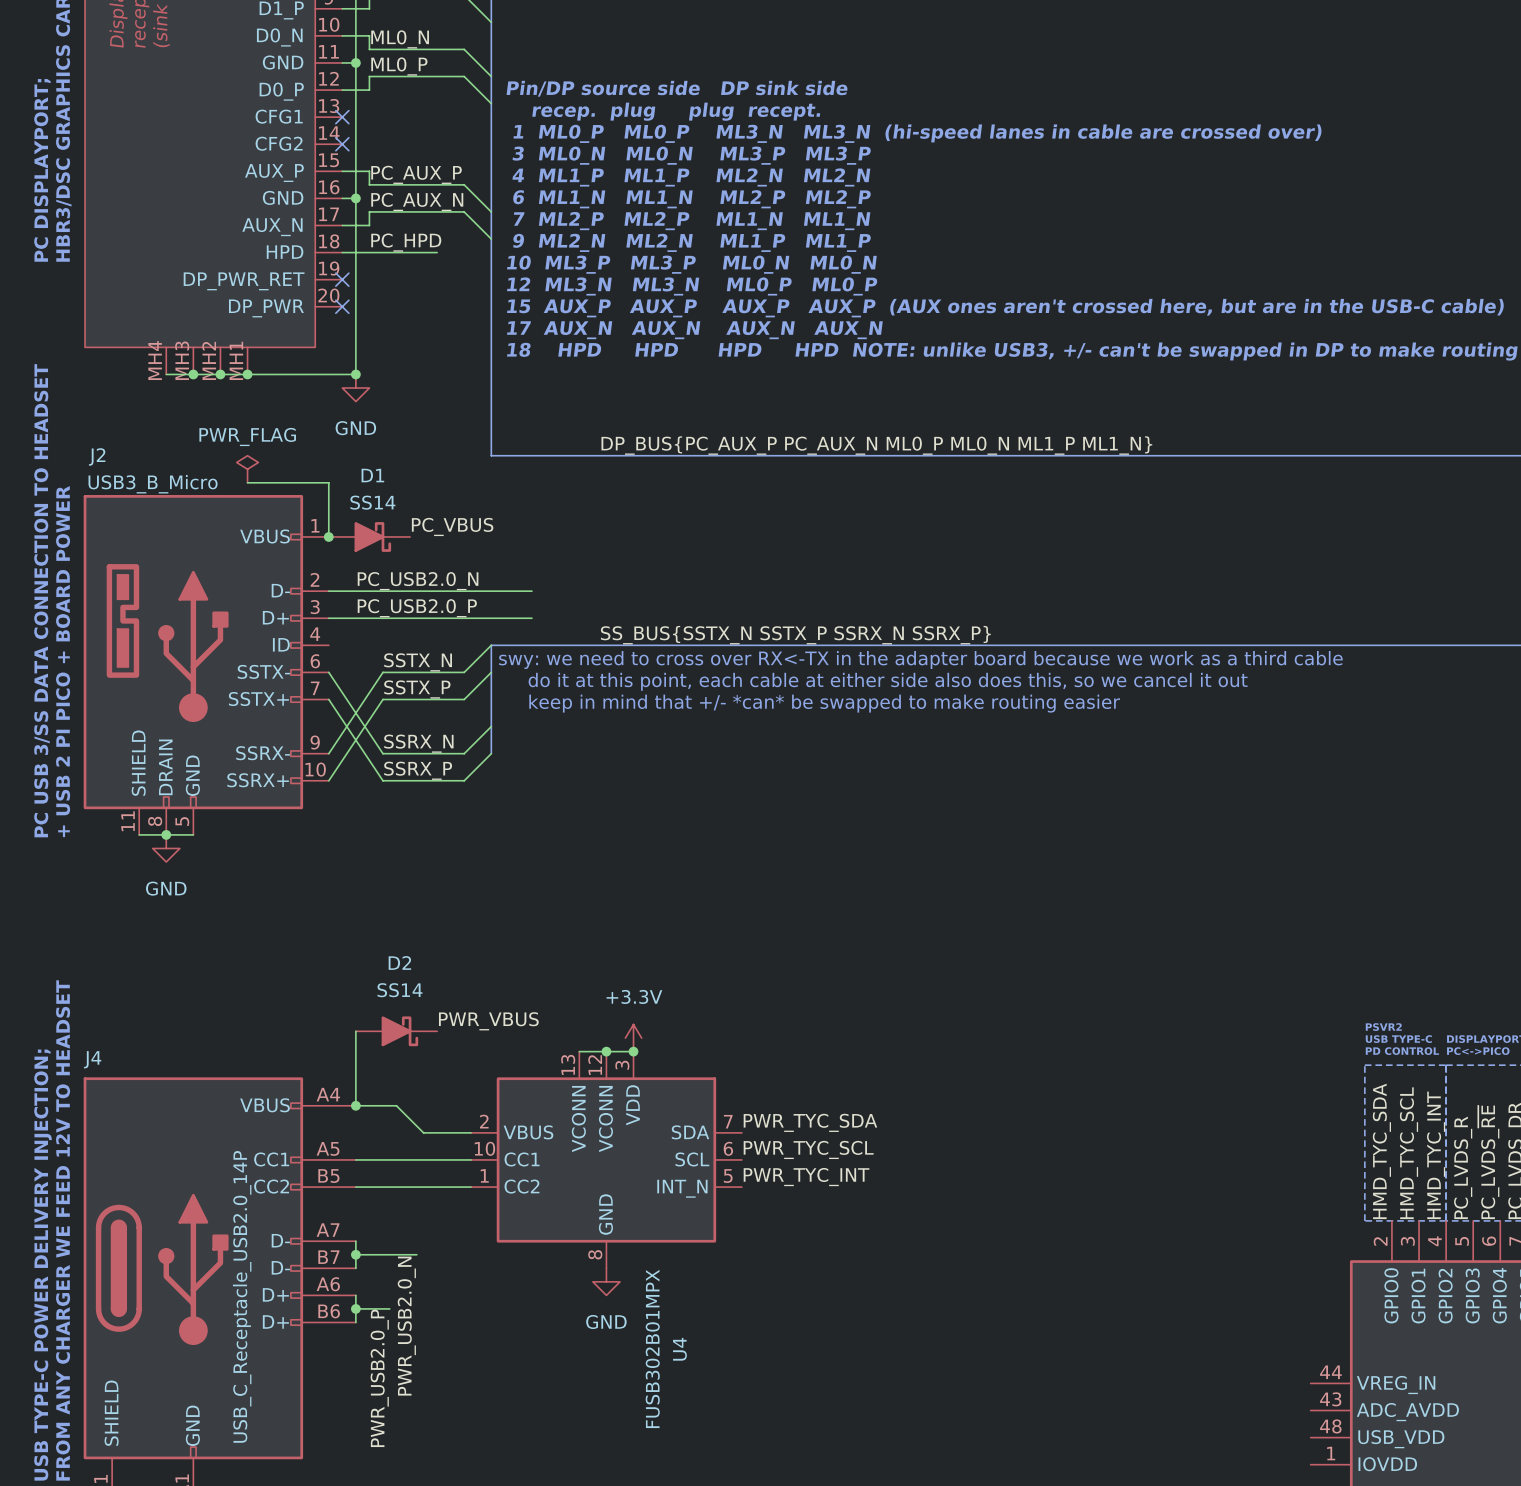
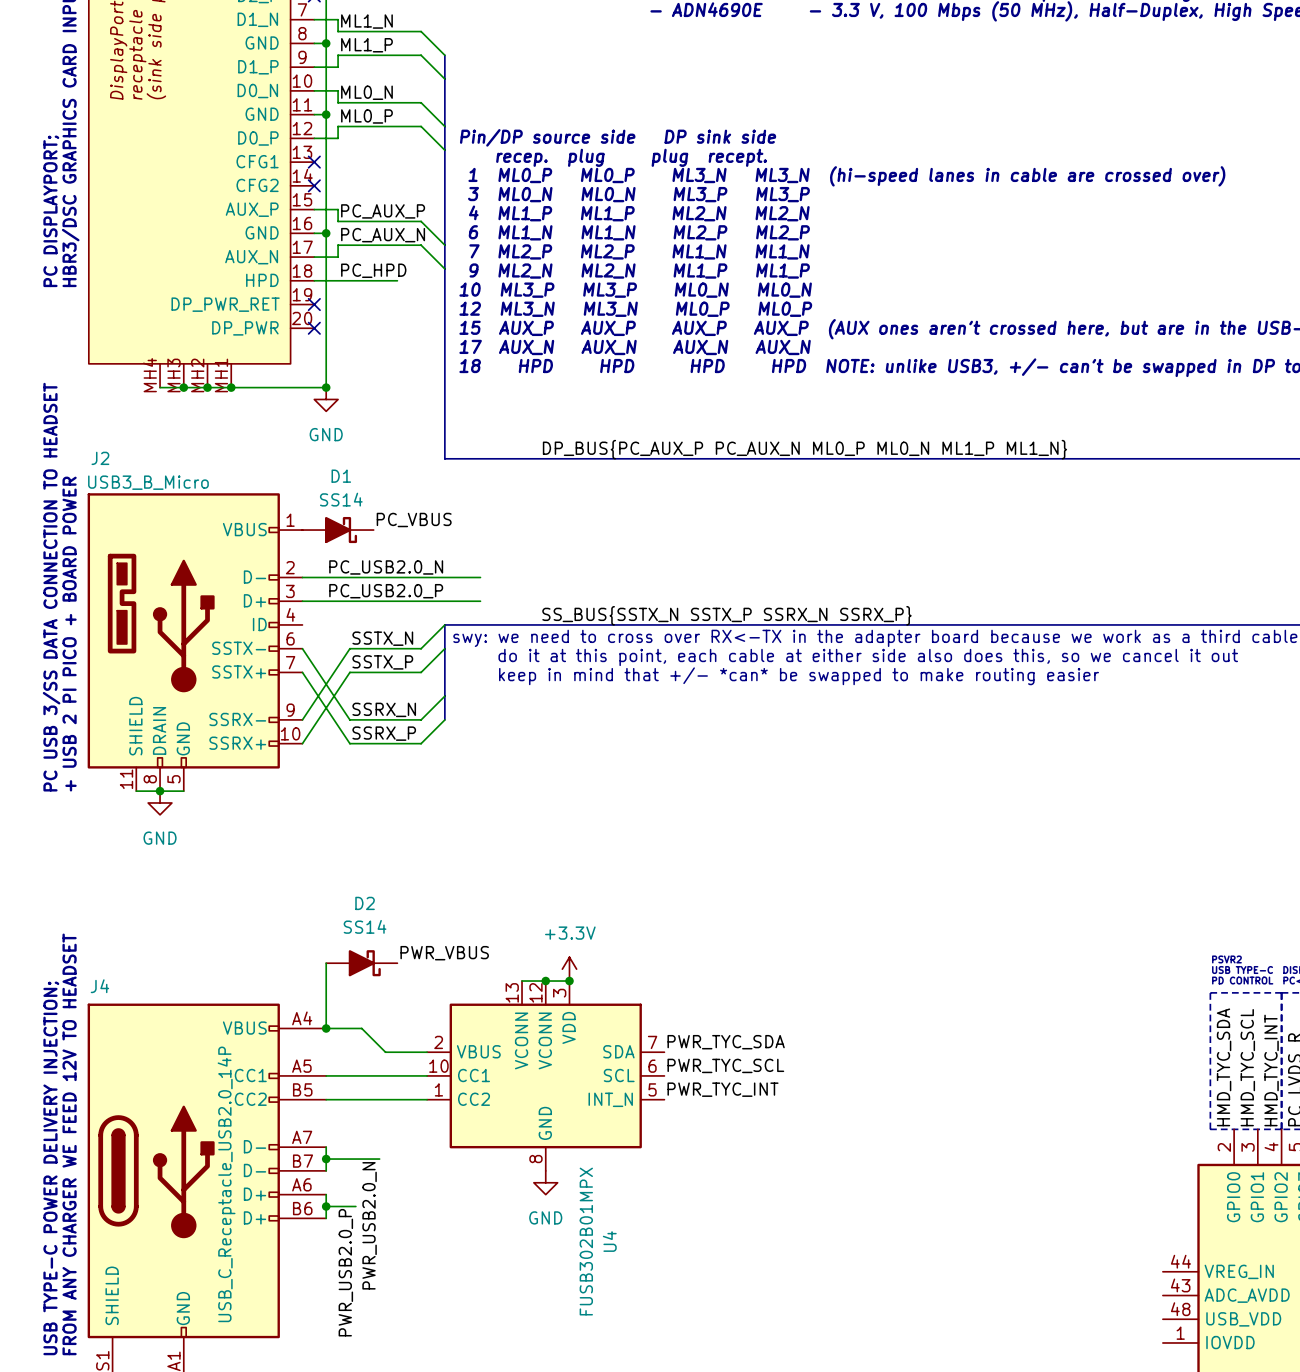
power symbol: PWR_FLAG (247, 469) -> none
wire: (247, 482) (328, 482) (328, 536) -> none
junction: (328, 536) -> none

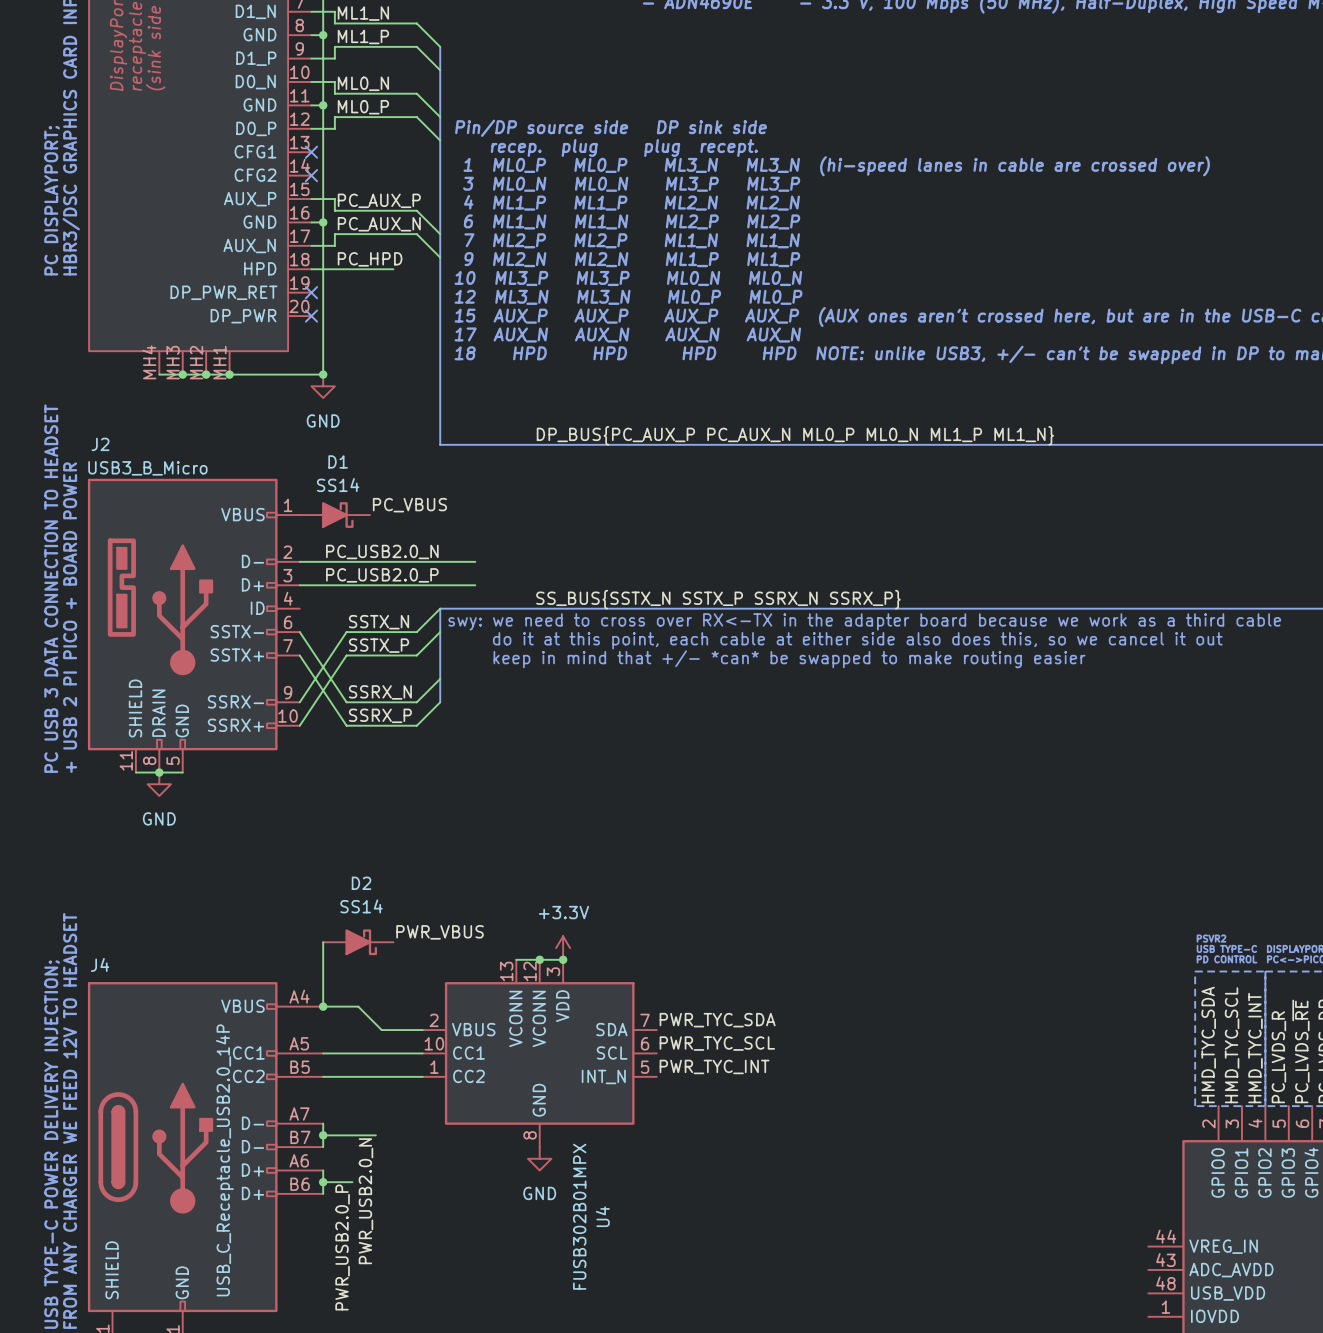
text: PC USB 3/SS DATA CONNECTION TO HEADSET (51, 587) -> PC USB 3 DATA CONNECTION TO HEADSET (51, 588)

